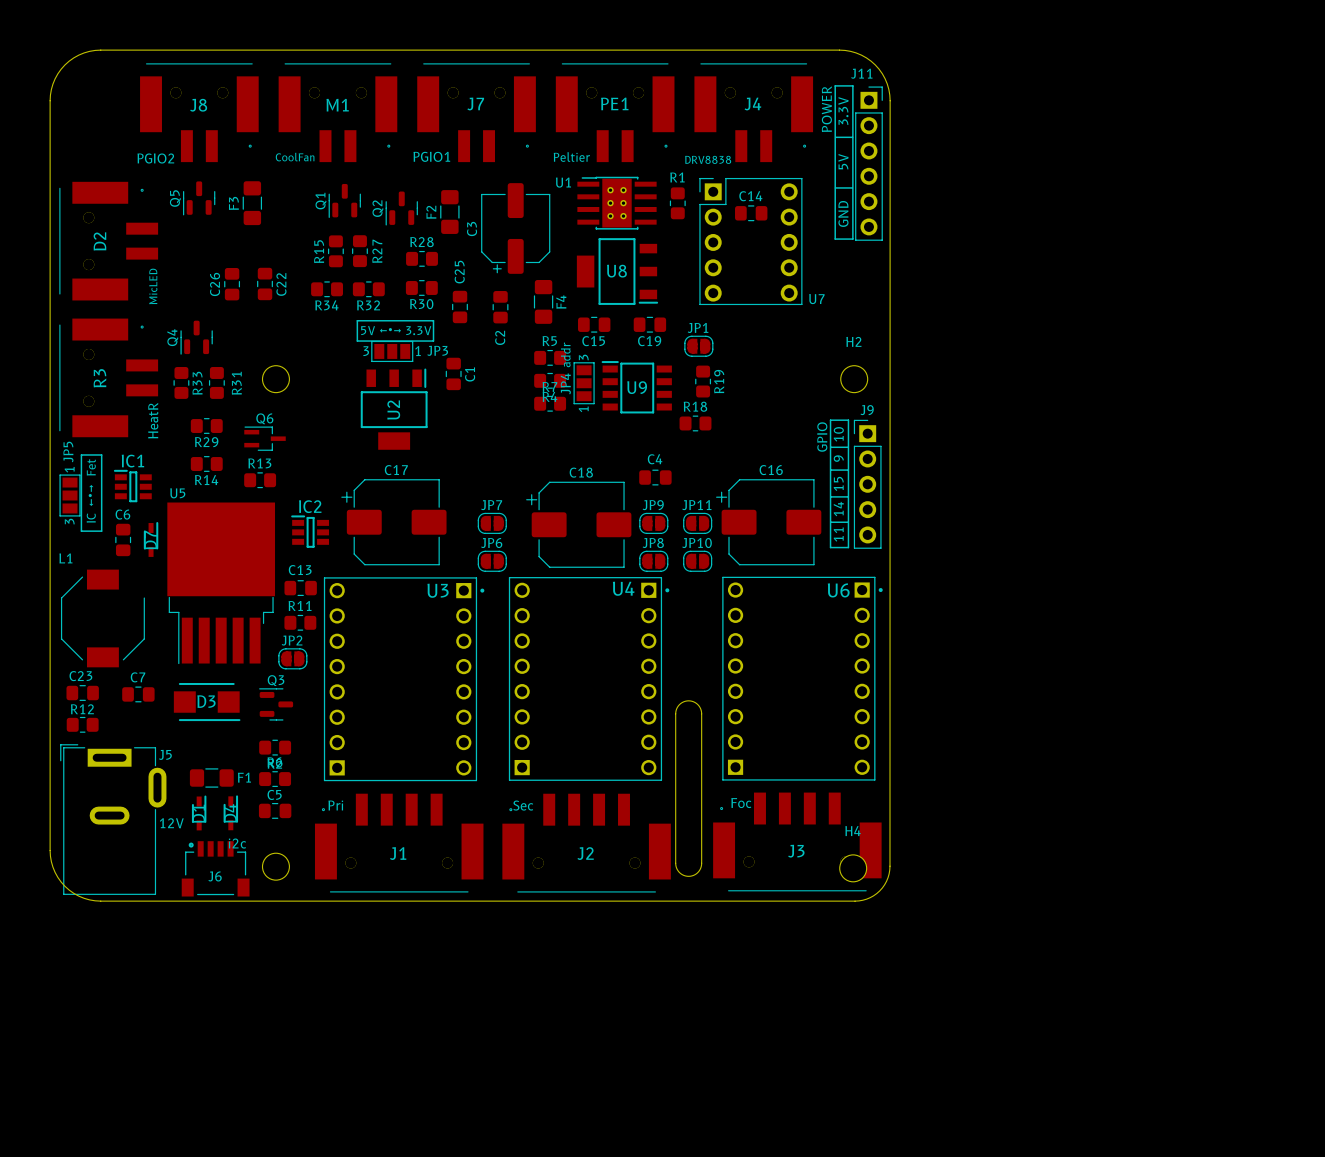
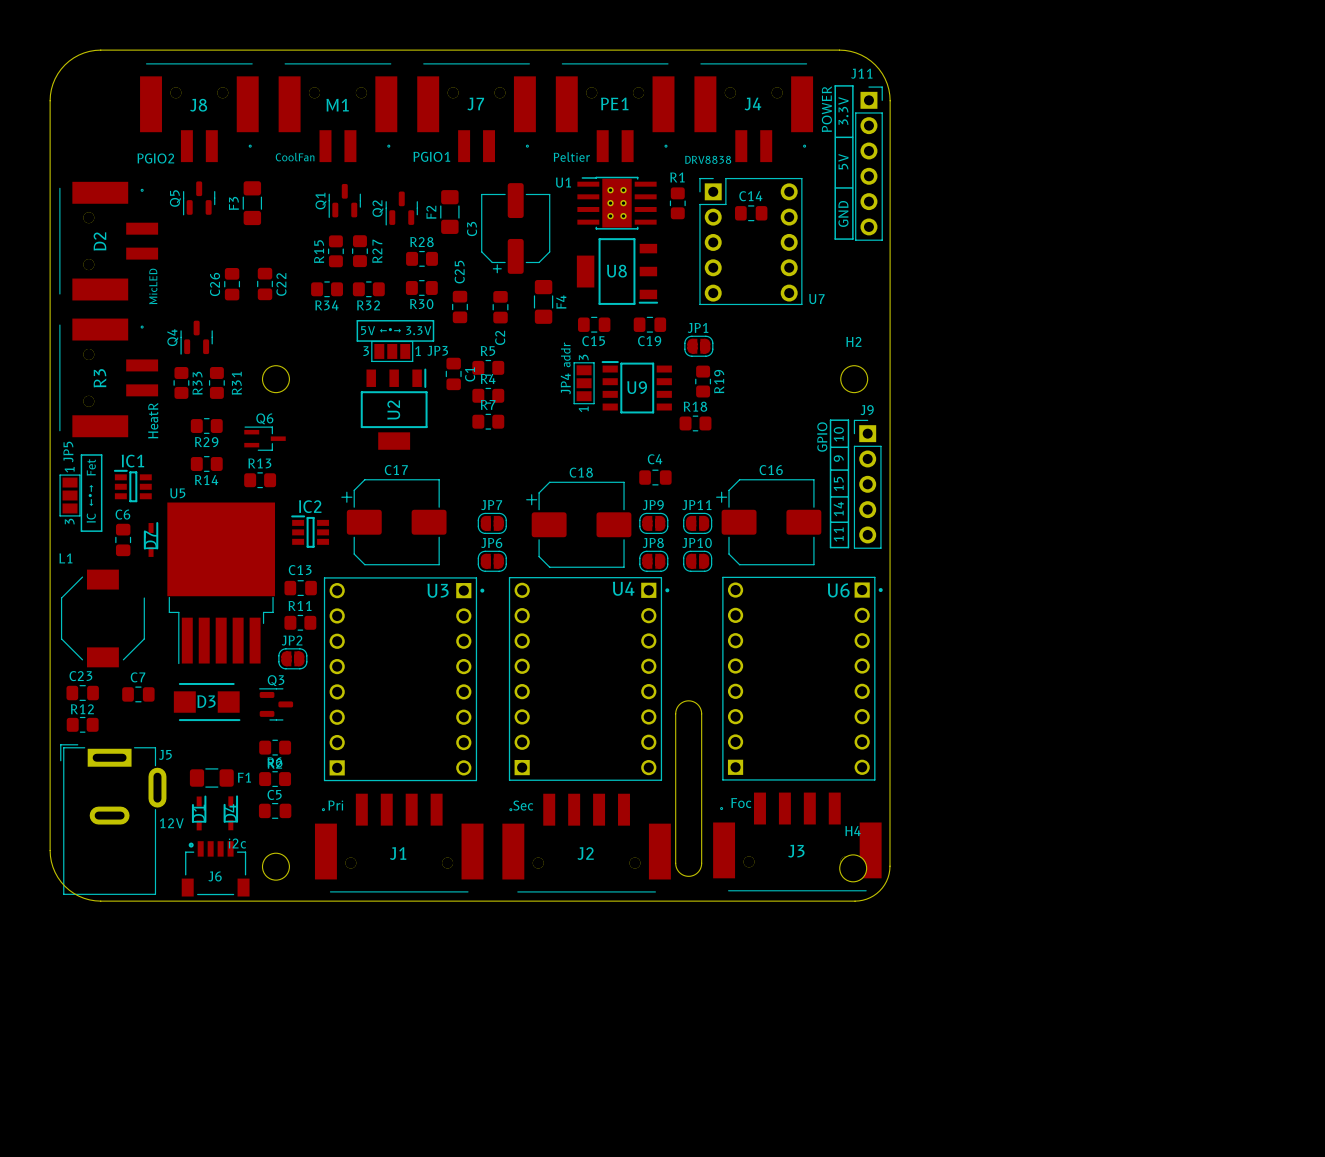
R5 position: (550, 357) -> (488, 367)
R4 position: (550, 380) -> (488, 395)
R4 name position: R4 (549, 396) -> R4 (488, 378)
R7 position: (550, 403) -> (488, 421)

